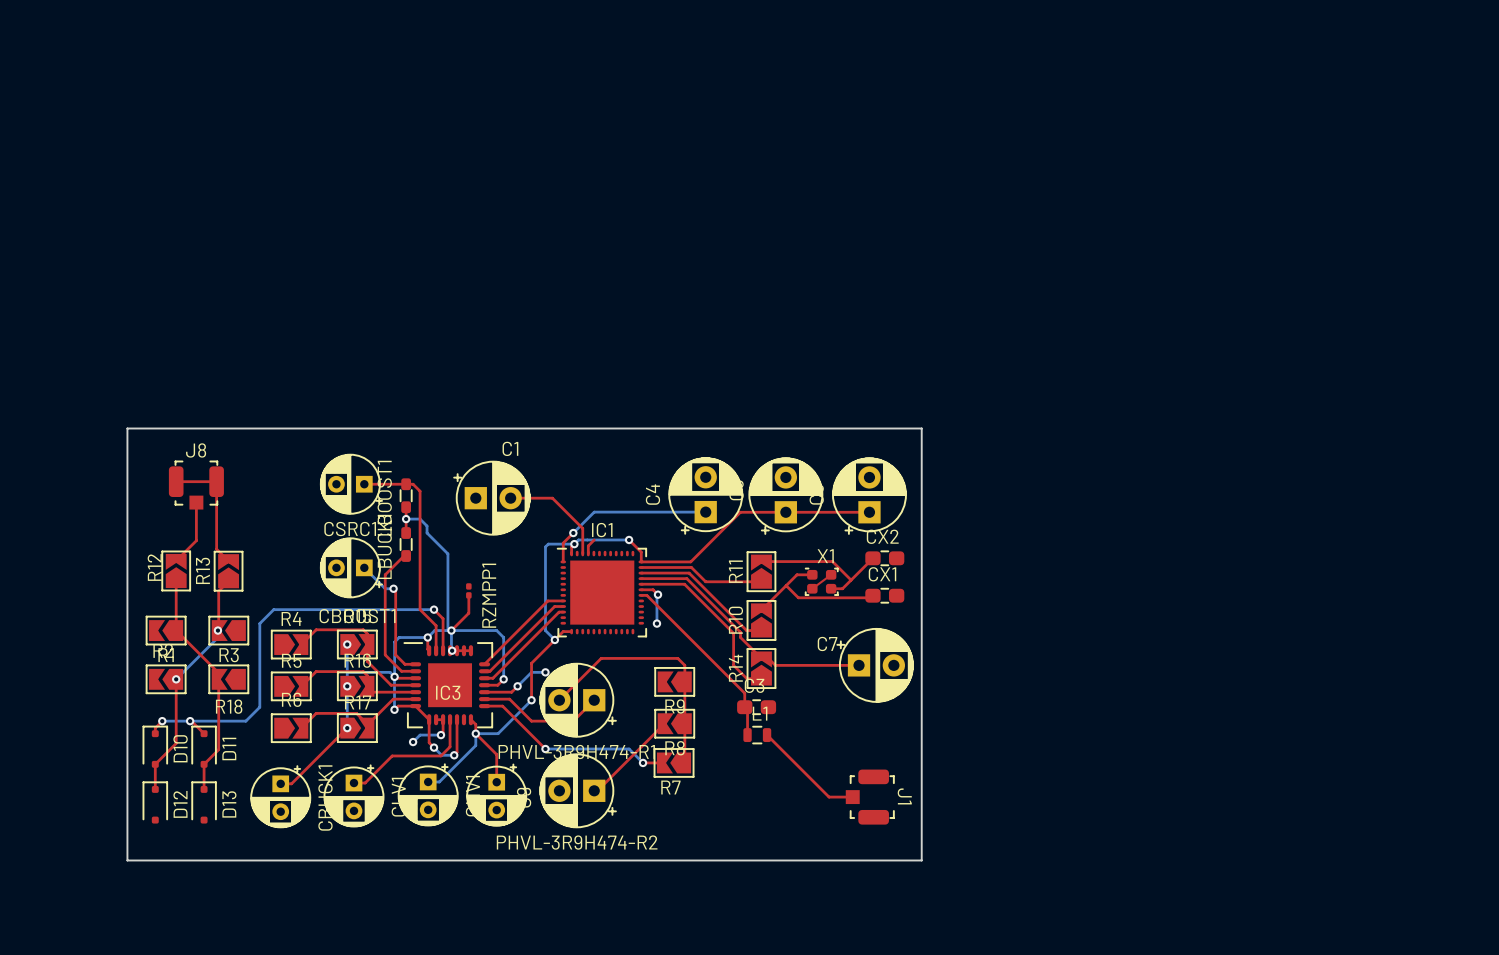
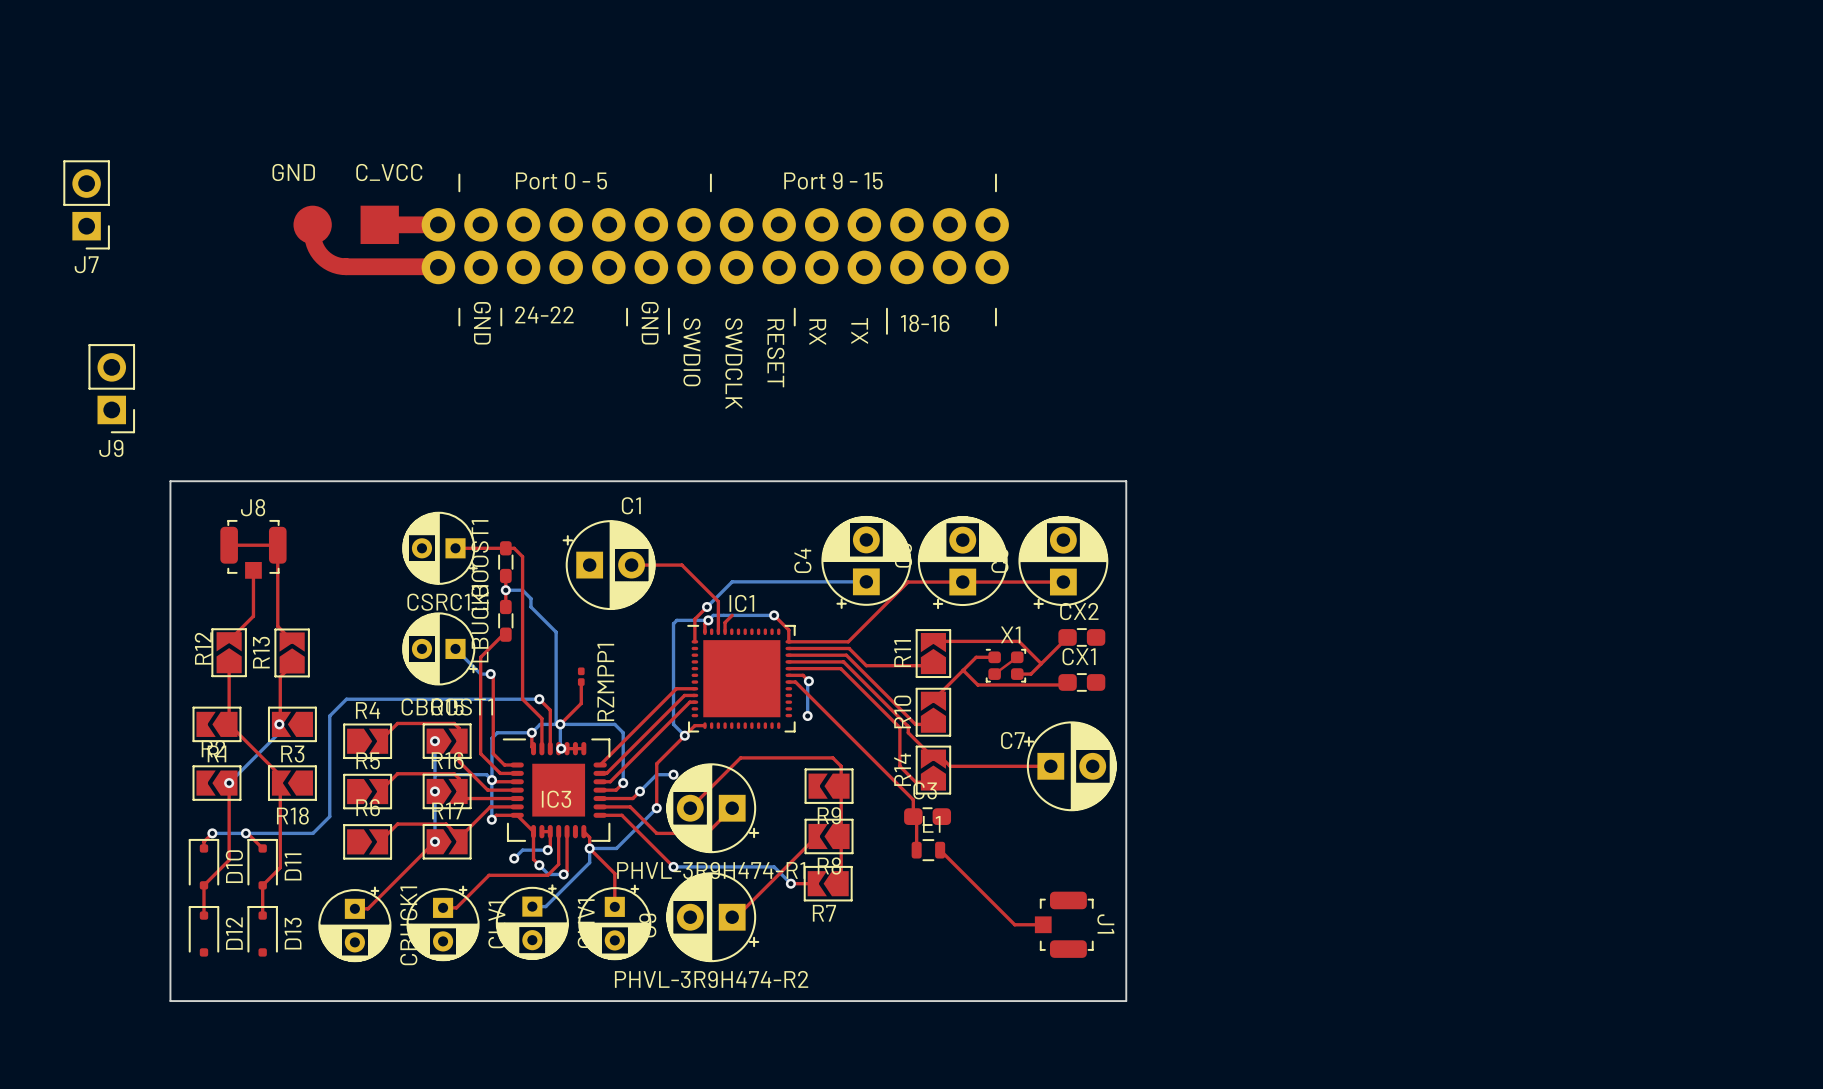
J7: none -> (86, 204)
part: none -> (651, 254)
J9: none -> (111, 388)

